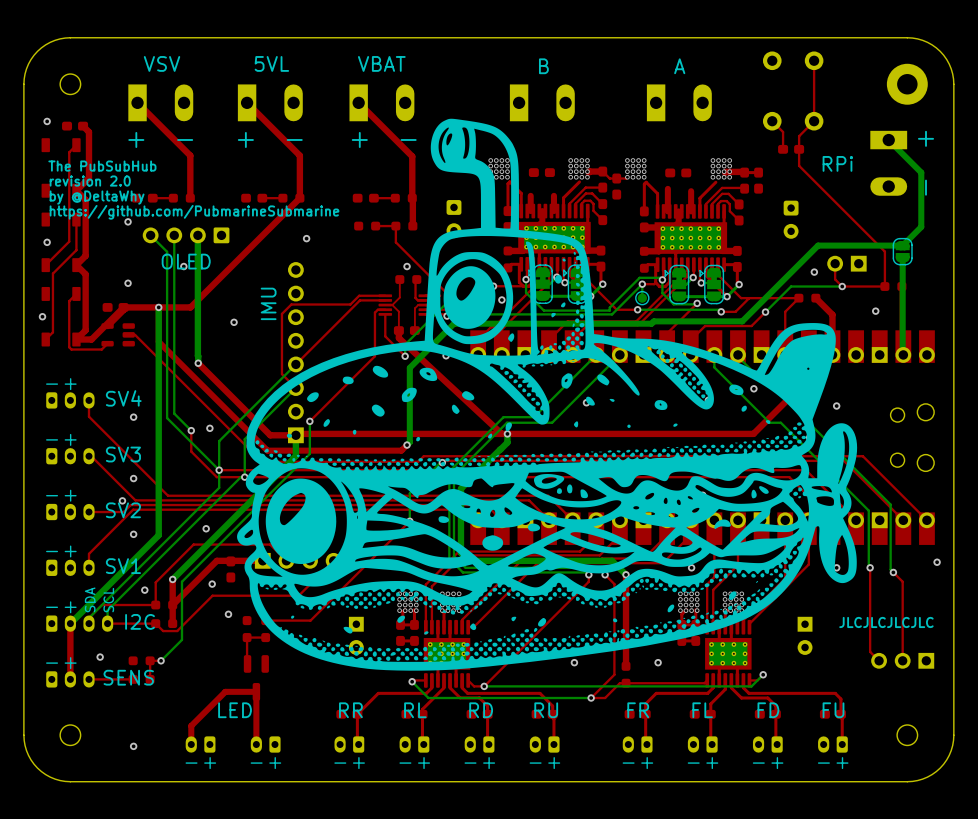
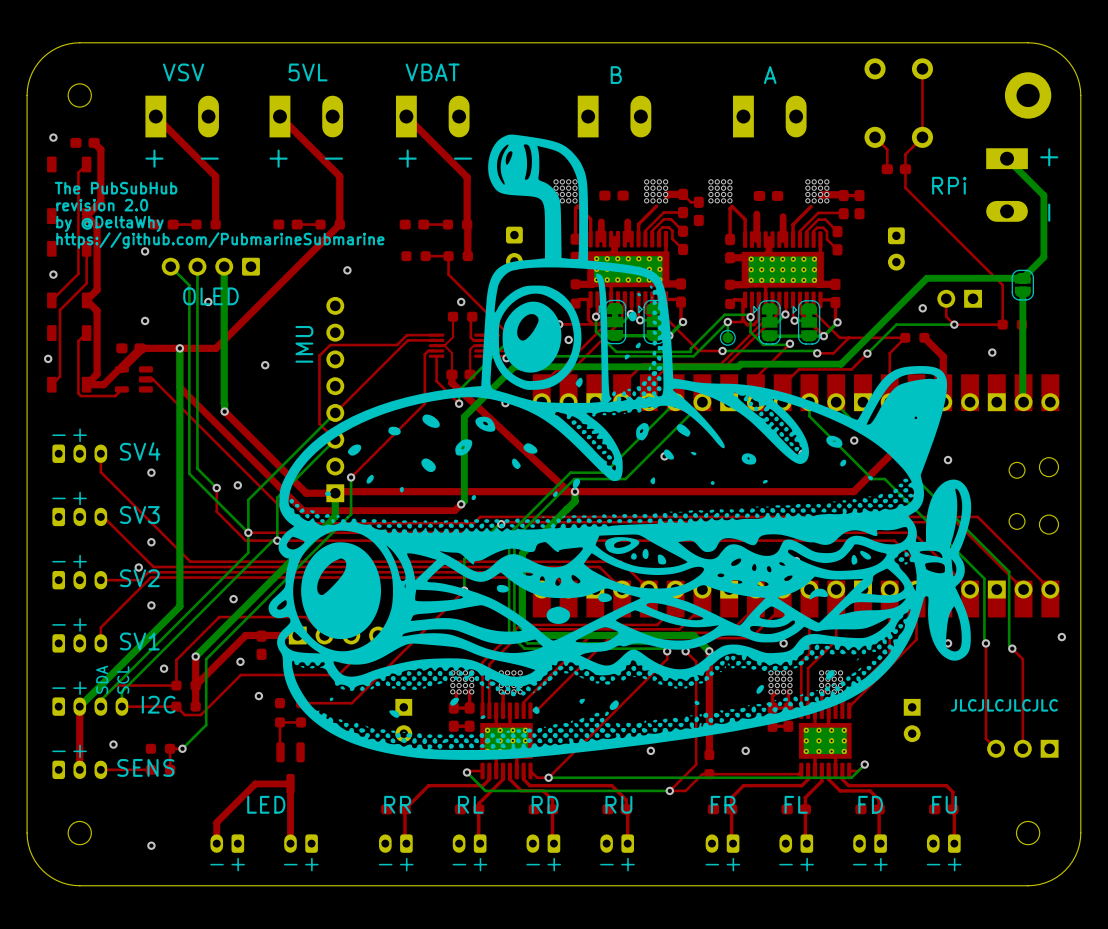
top track: (627, 177) (616, 178) -> none

